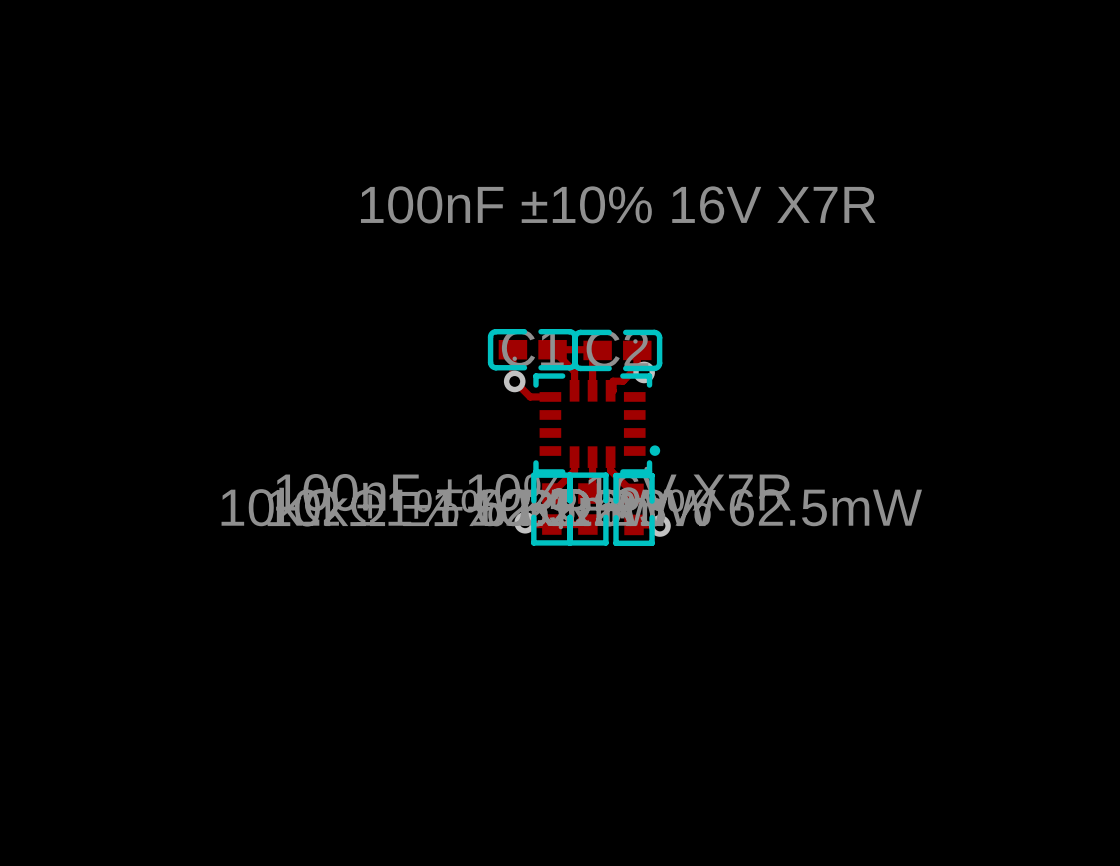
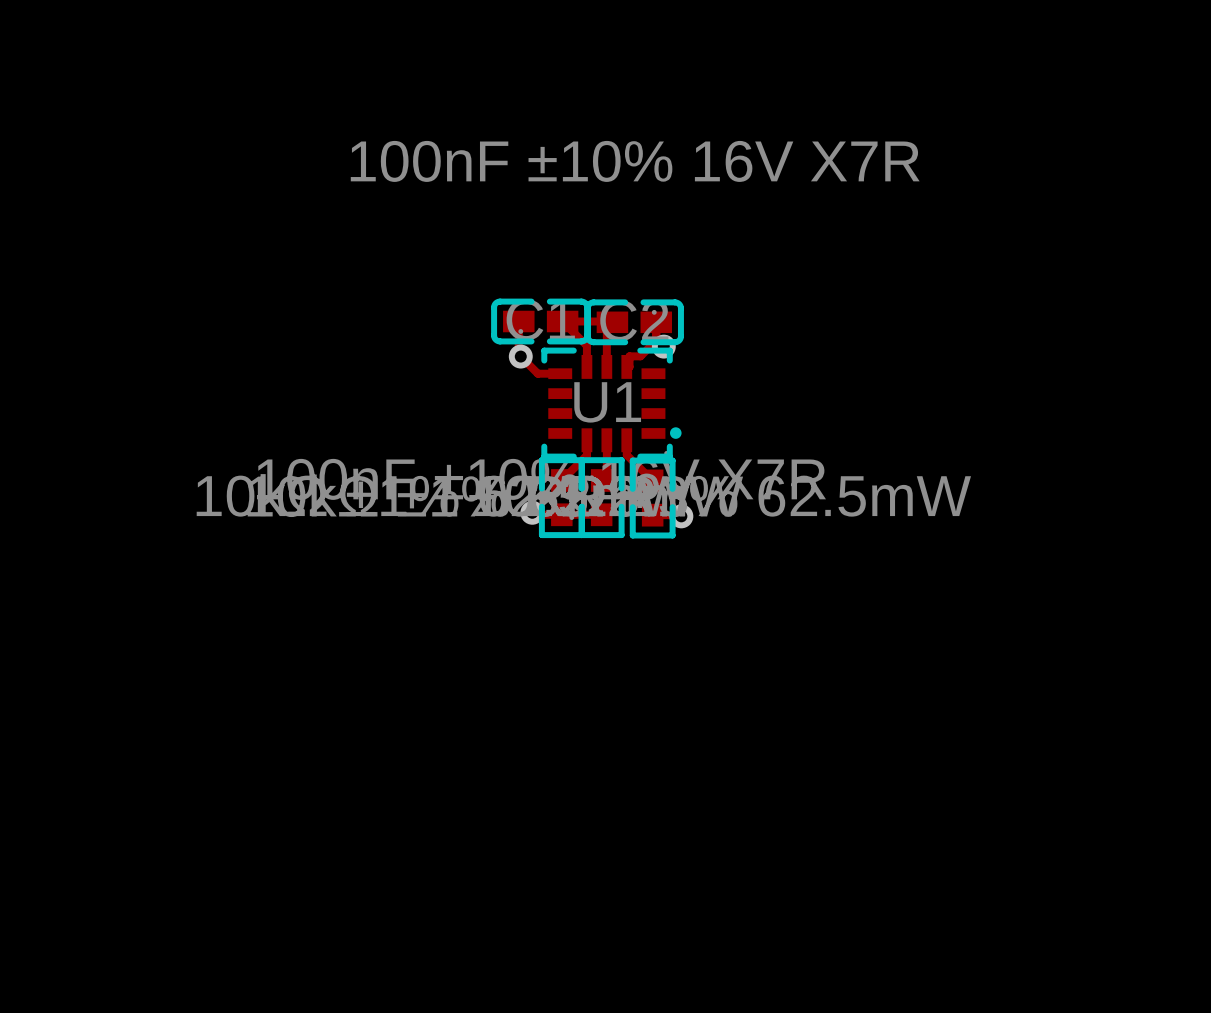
U1 name: none -> U1 (607, 402)

